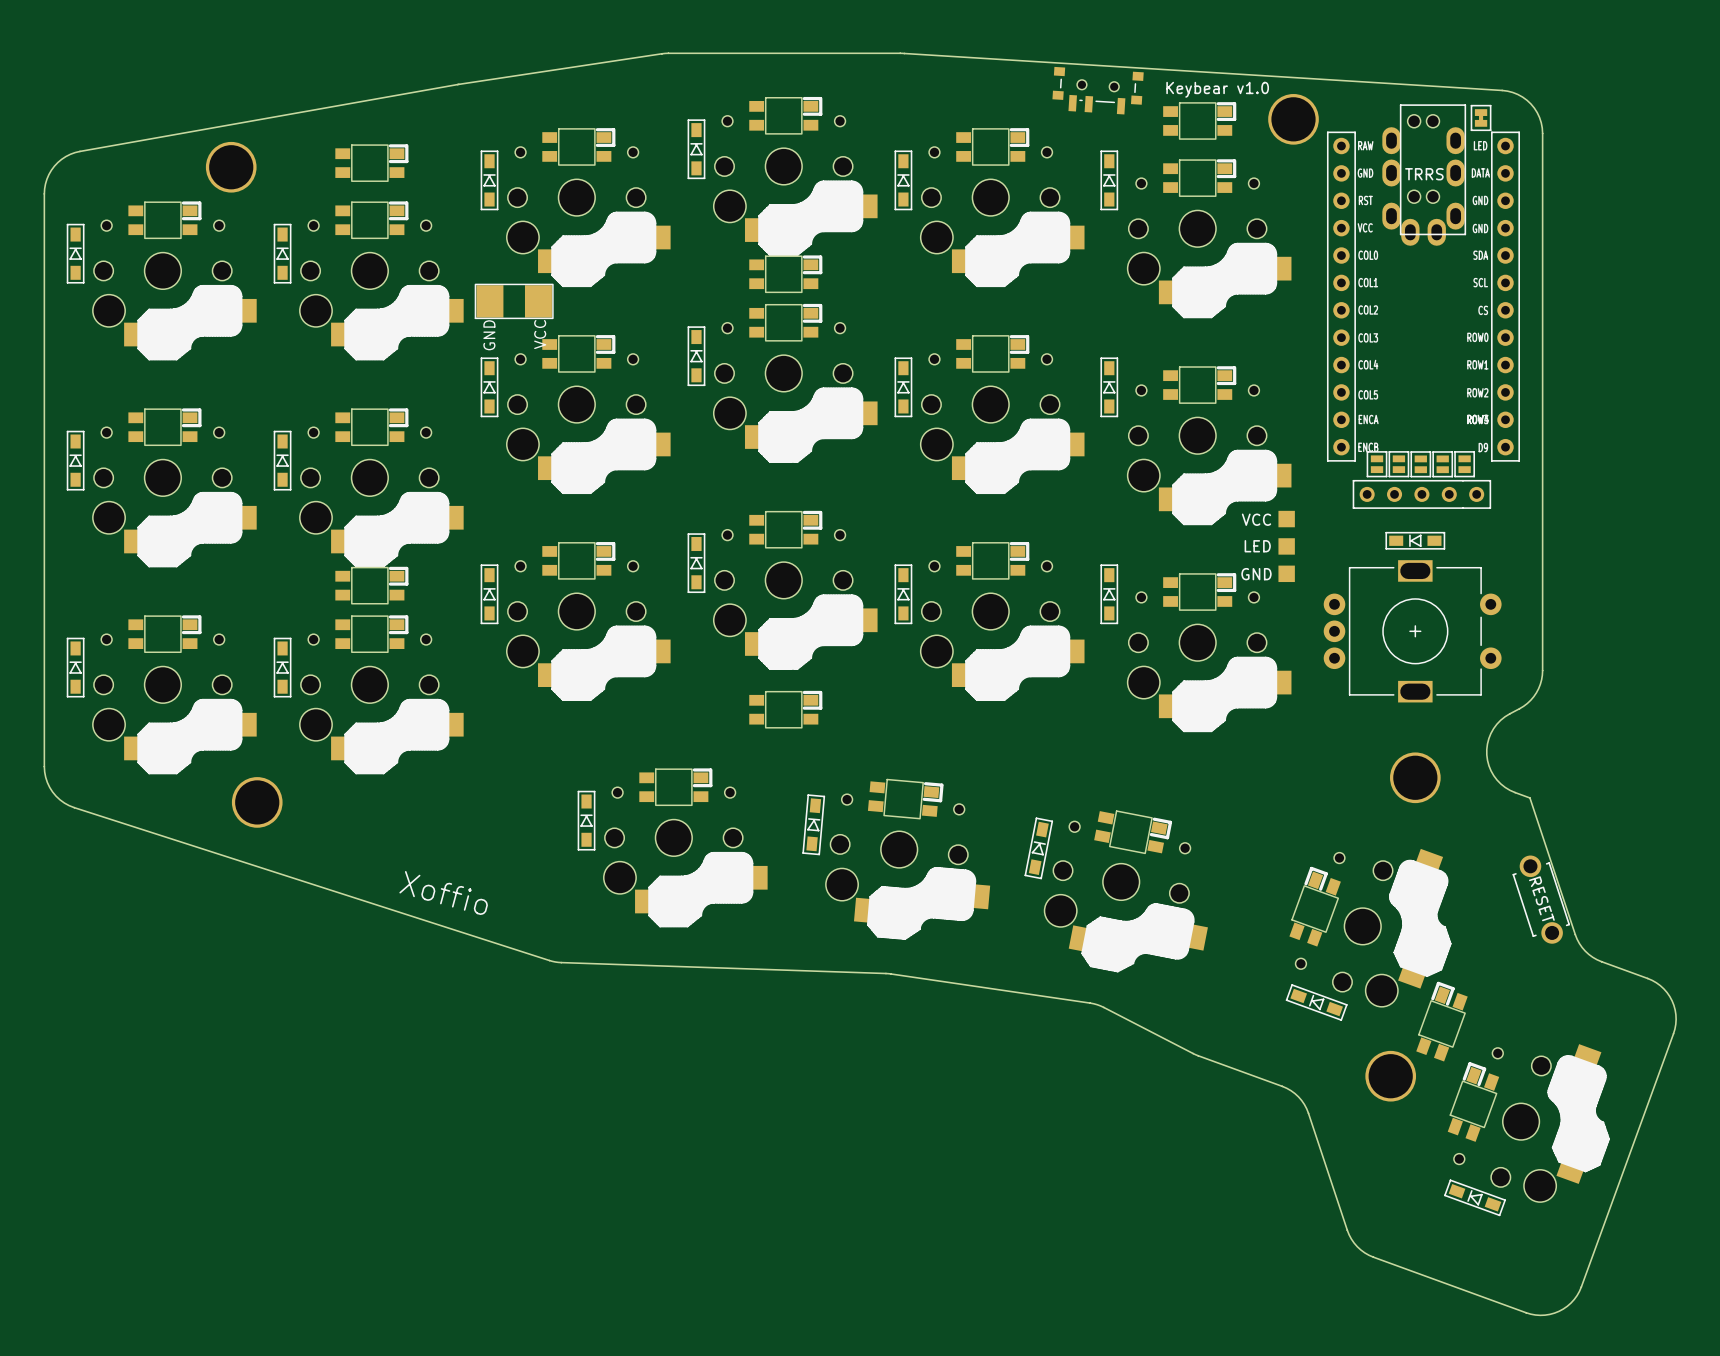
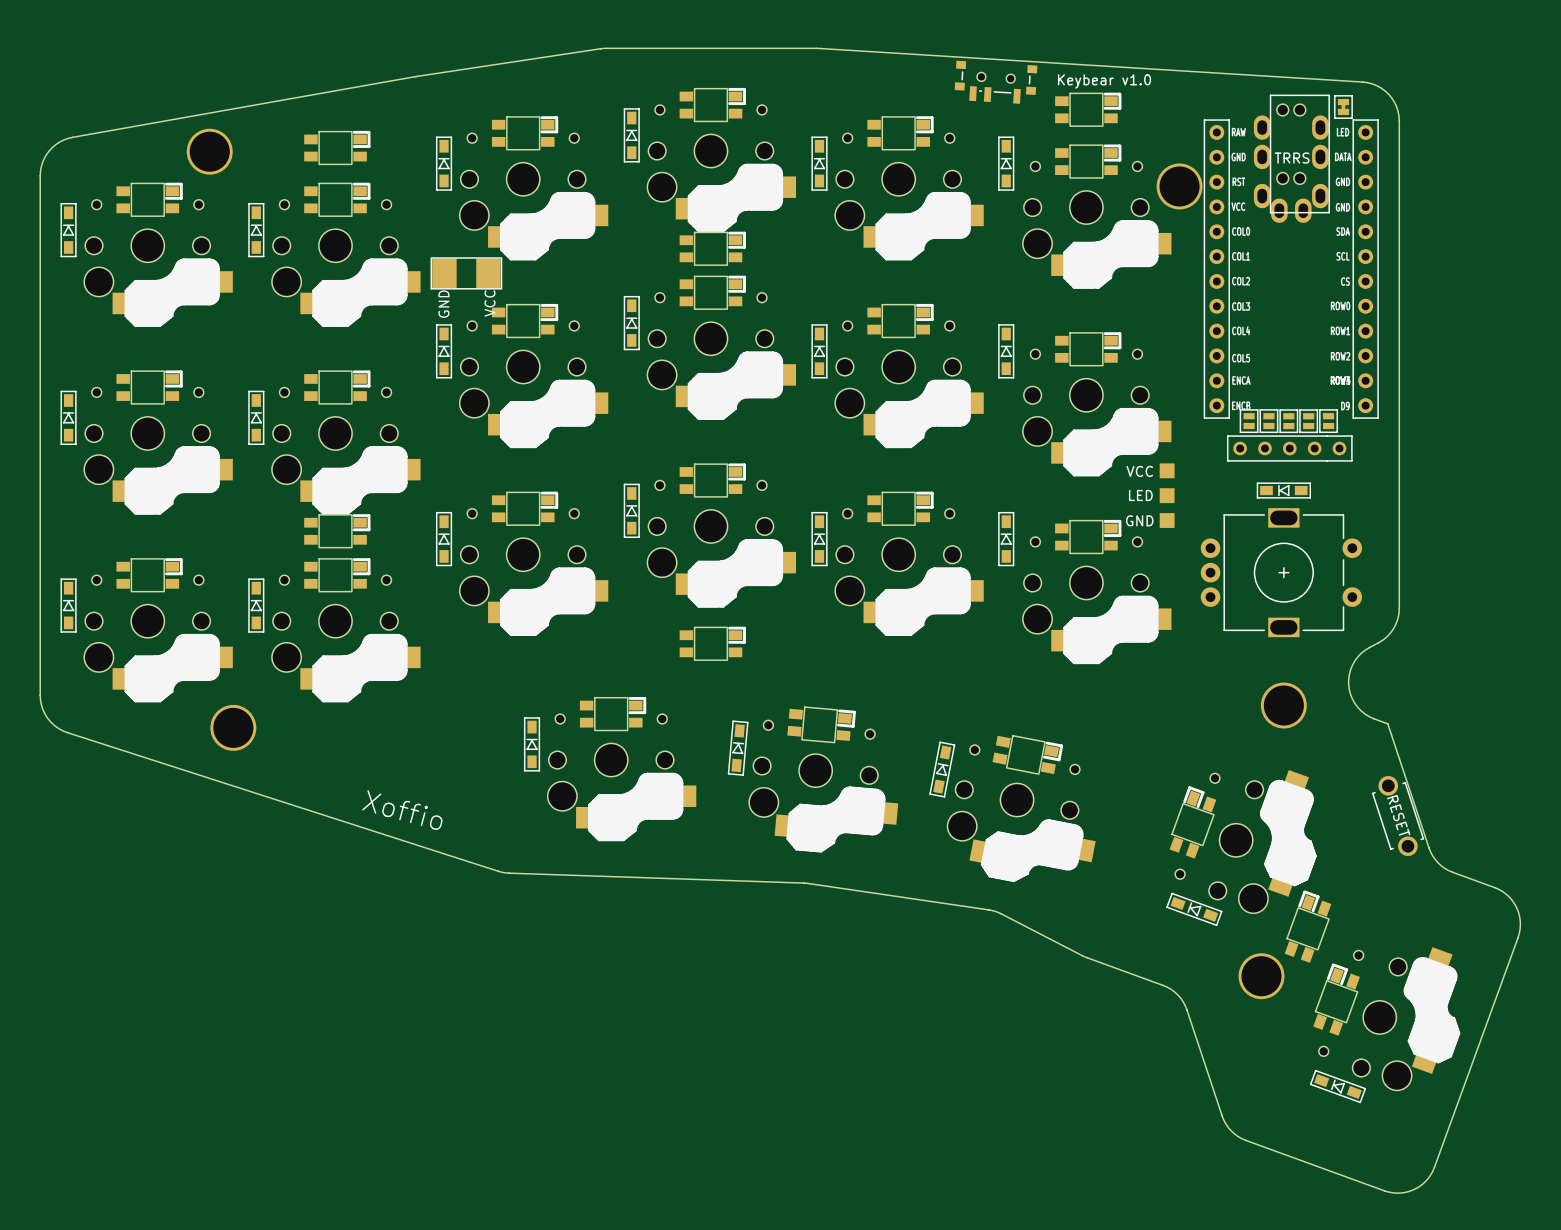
part position: (1293, 119) -> (1179, 186)

